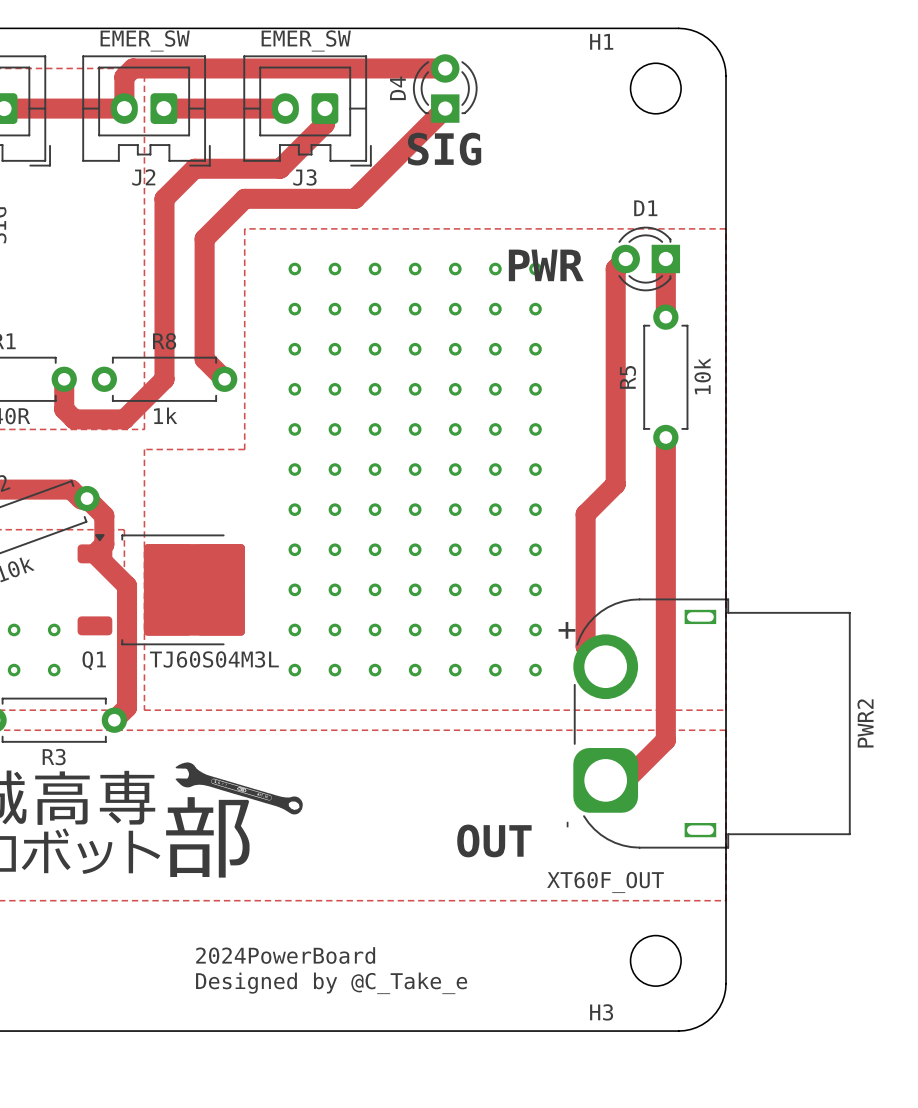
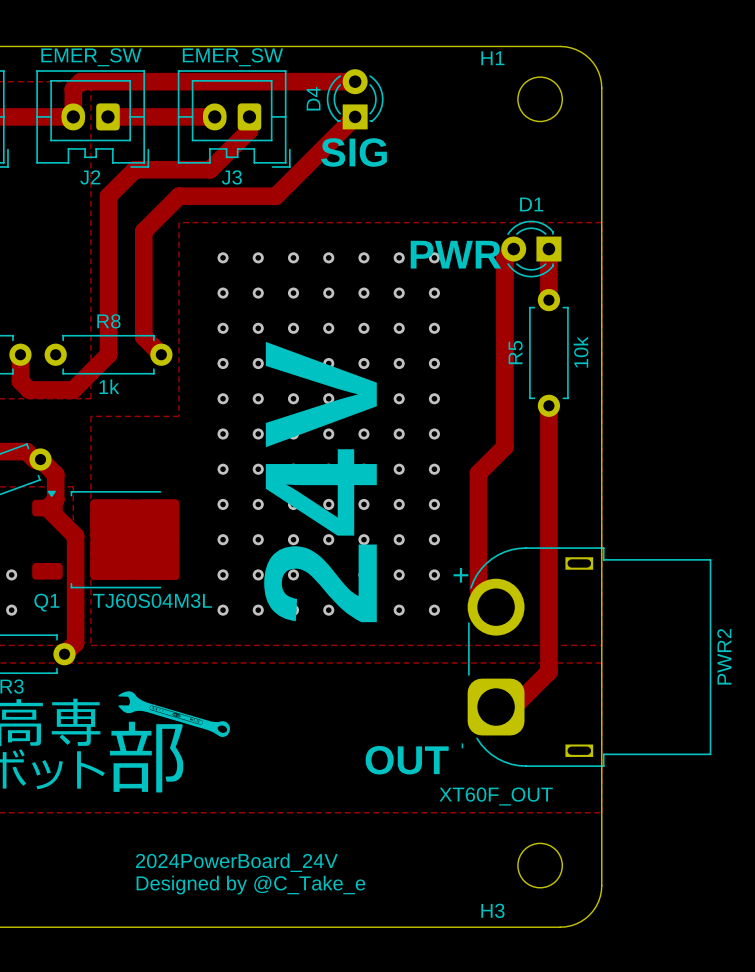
text: none -> 24V (320, 482)
text: 2024PowerBoard (285, 955) -> 2024PowerBoard_24V (236, 862)

